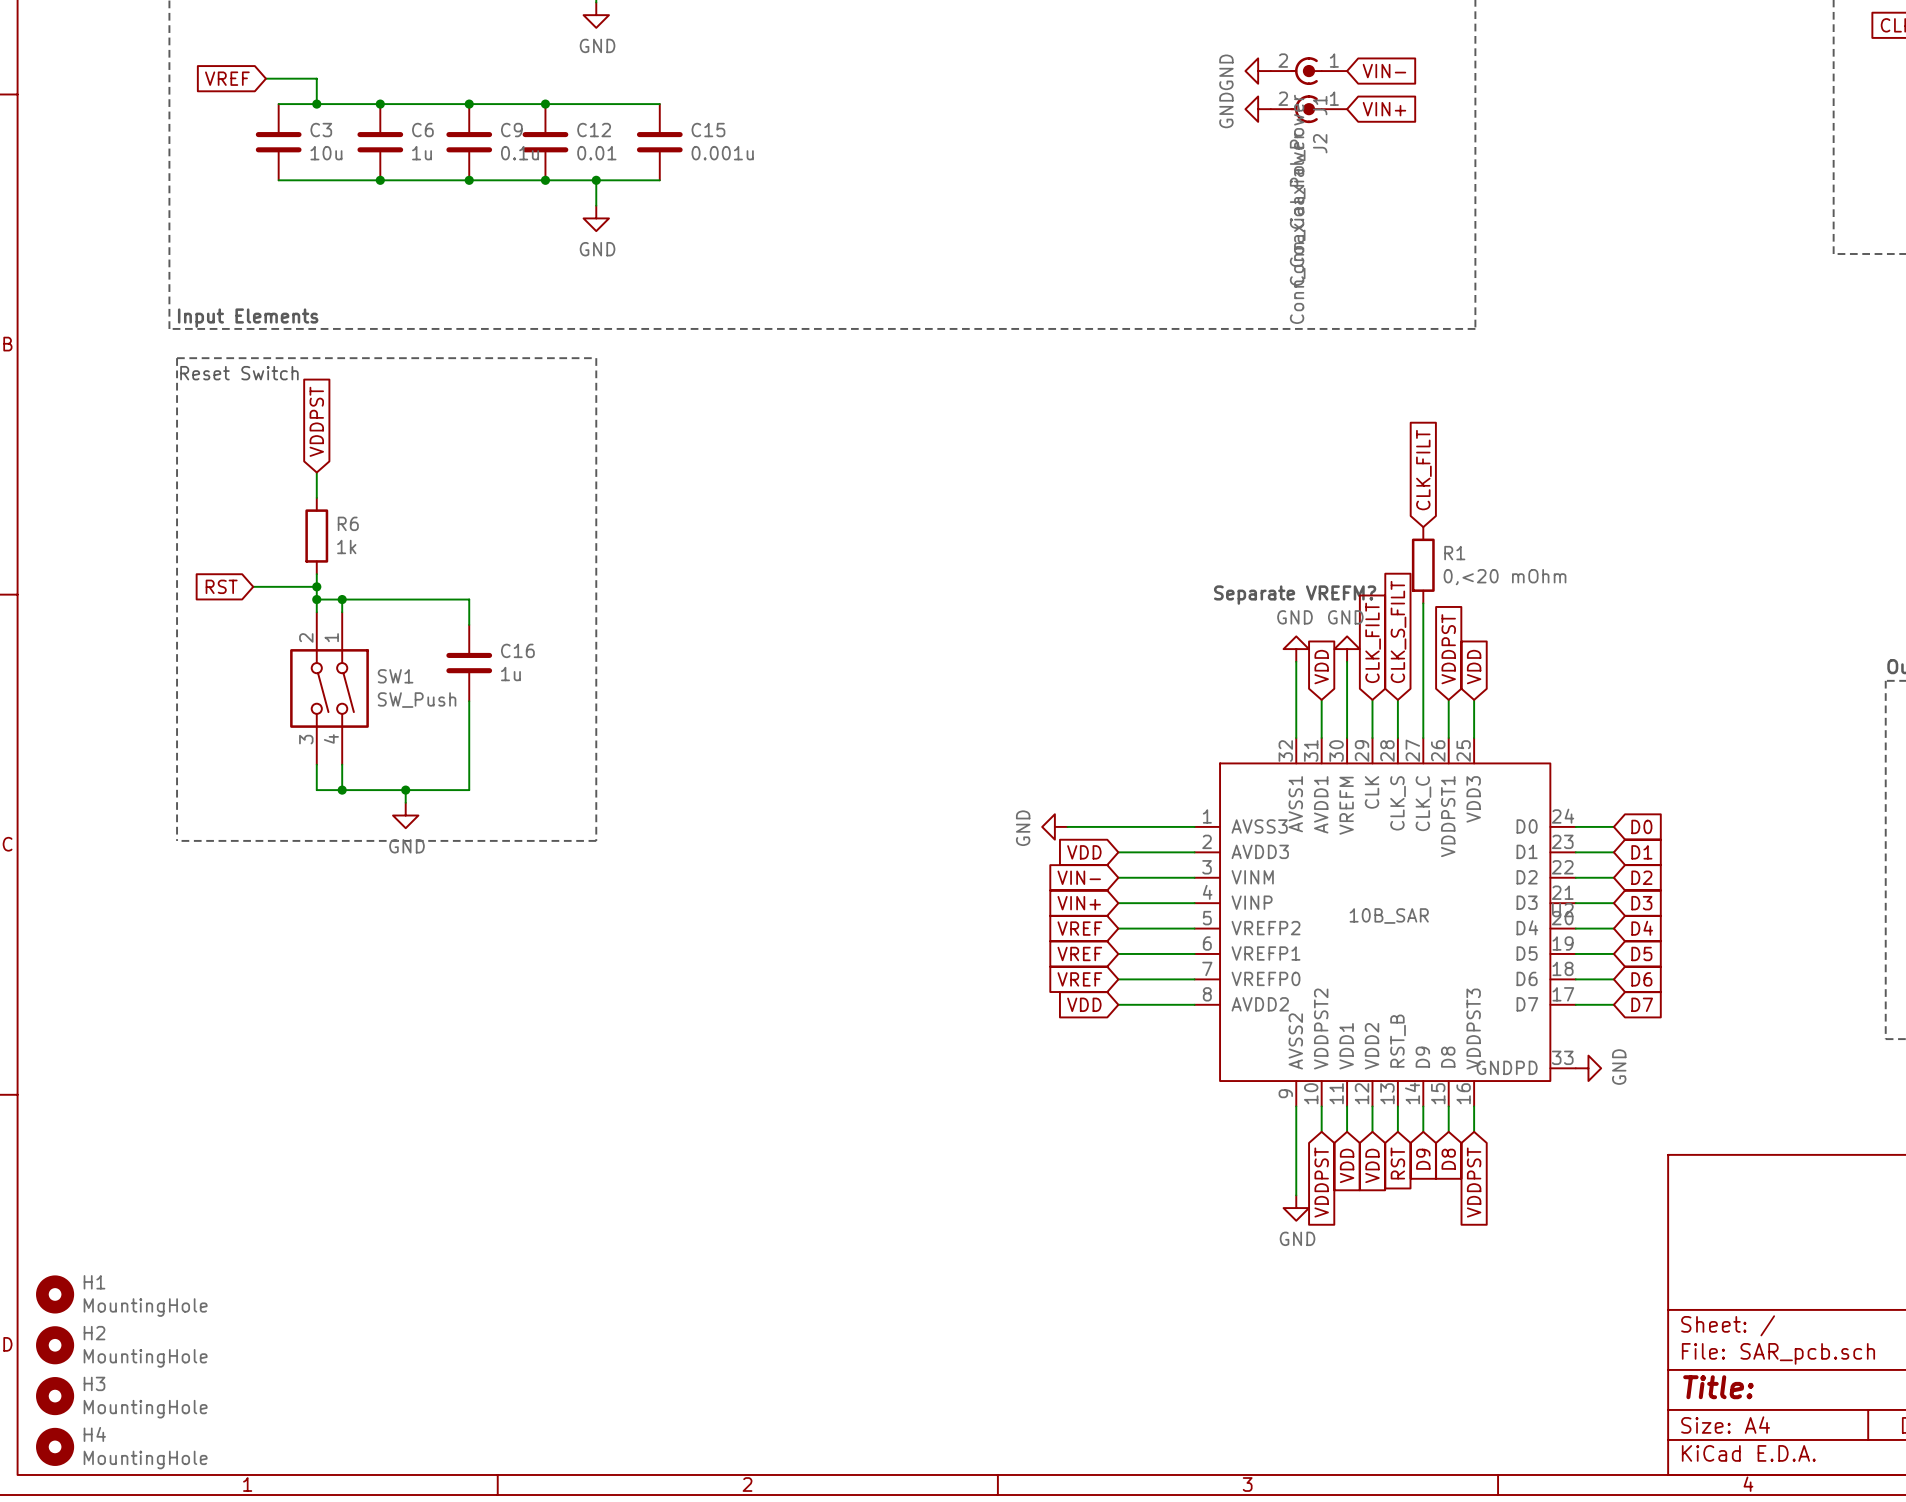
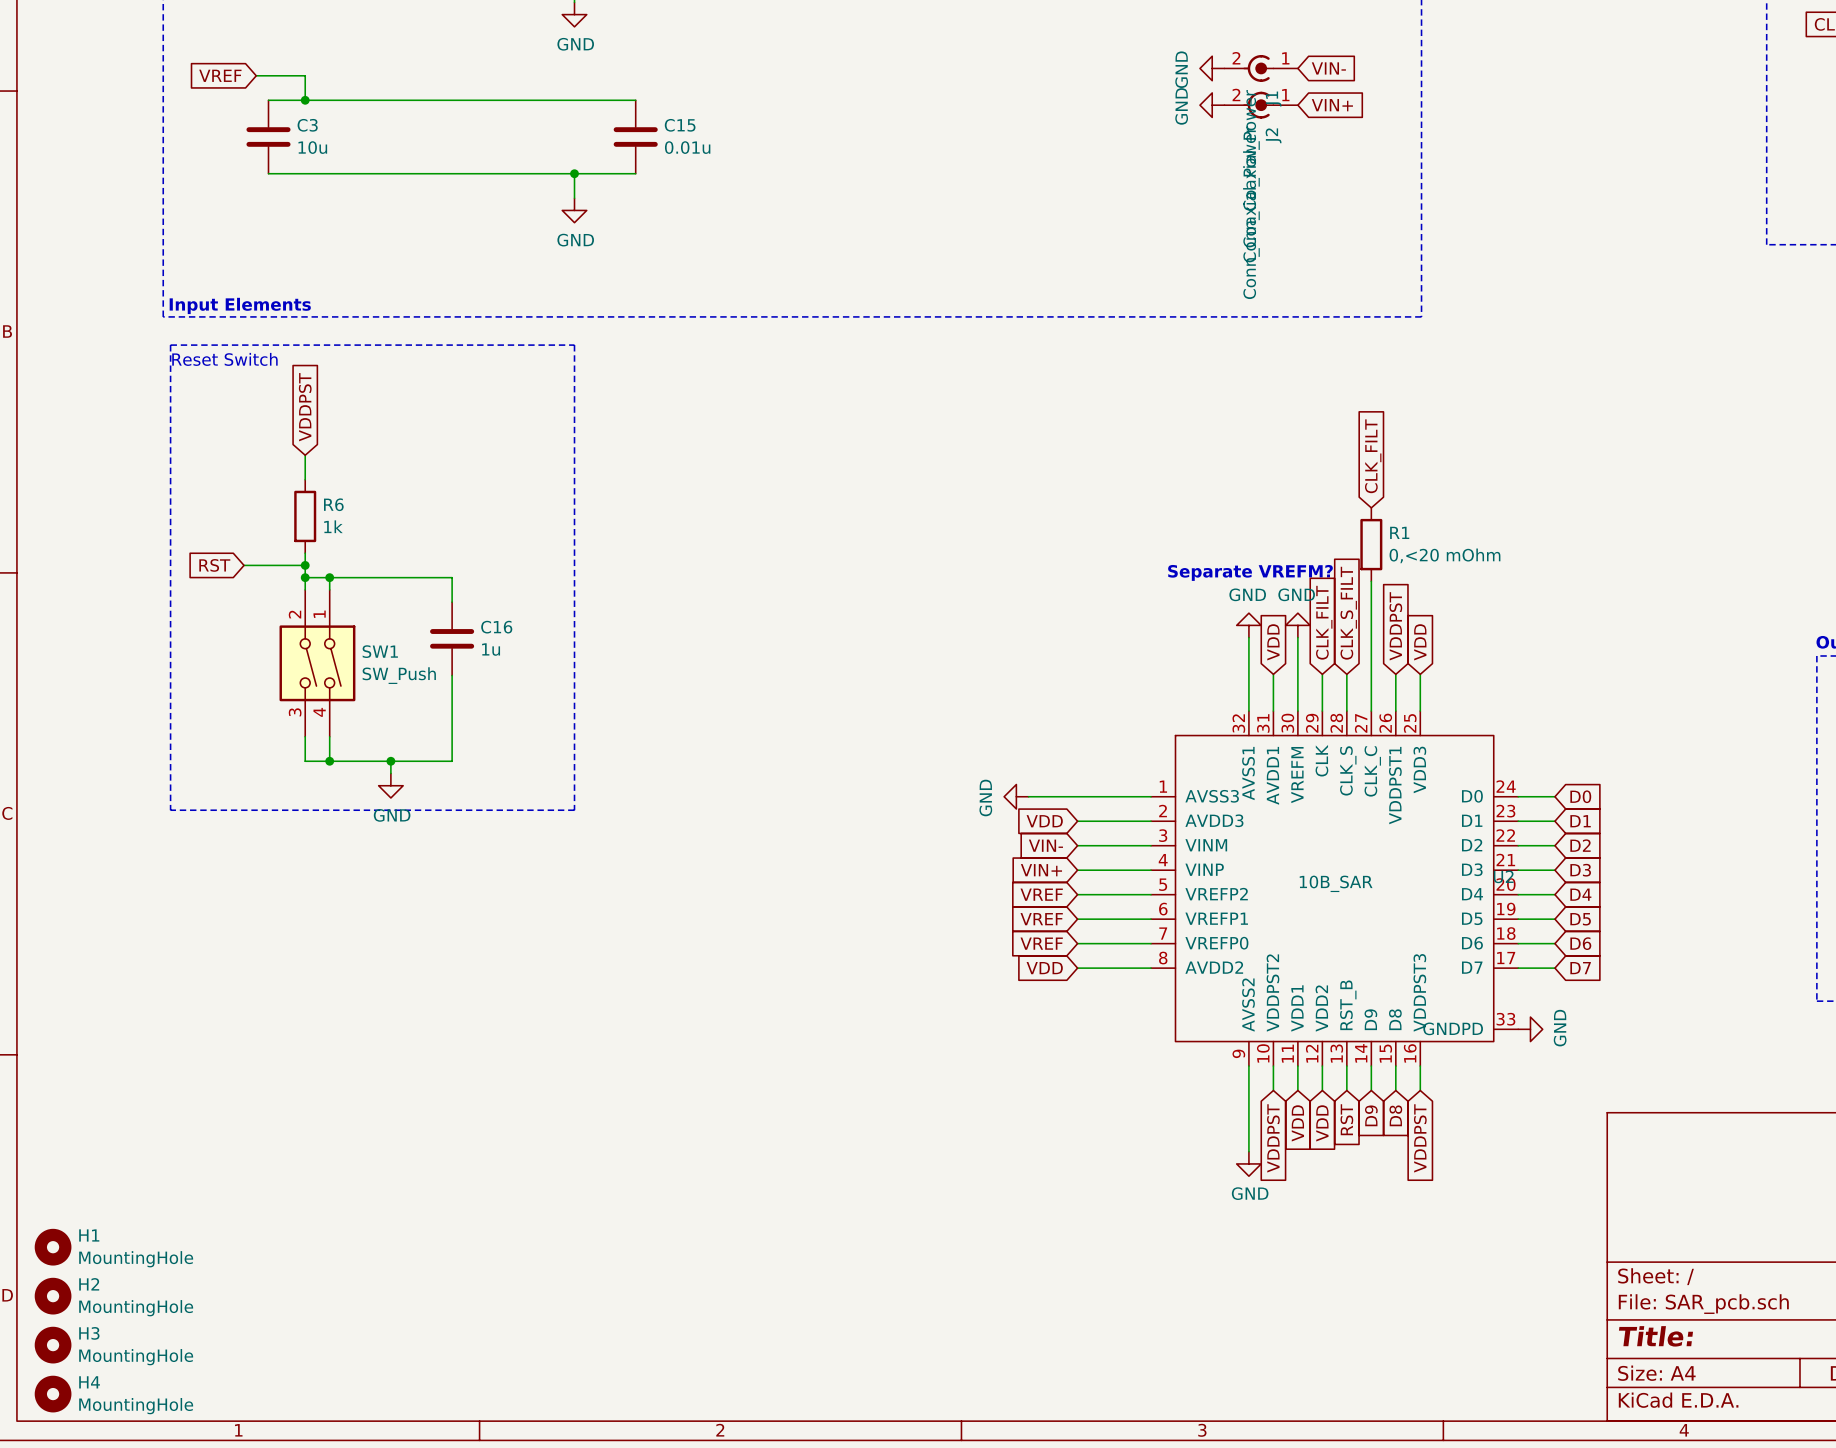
junction: (380, 104) -> none
junction: (469, 104) -> none
junction: (545, 104) -> none
C6: 1u (380, 142) -> none
C9: 0.1u (469, 142) -> none
C12: 0.01 (545, 142) -> none
C15 value: 0.001u (722, 153) -> 0.01u (687, 147)
junction: (380, 180) -> none
junction: (469, 180) -> none
junction: (545, 180) -> none

